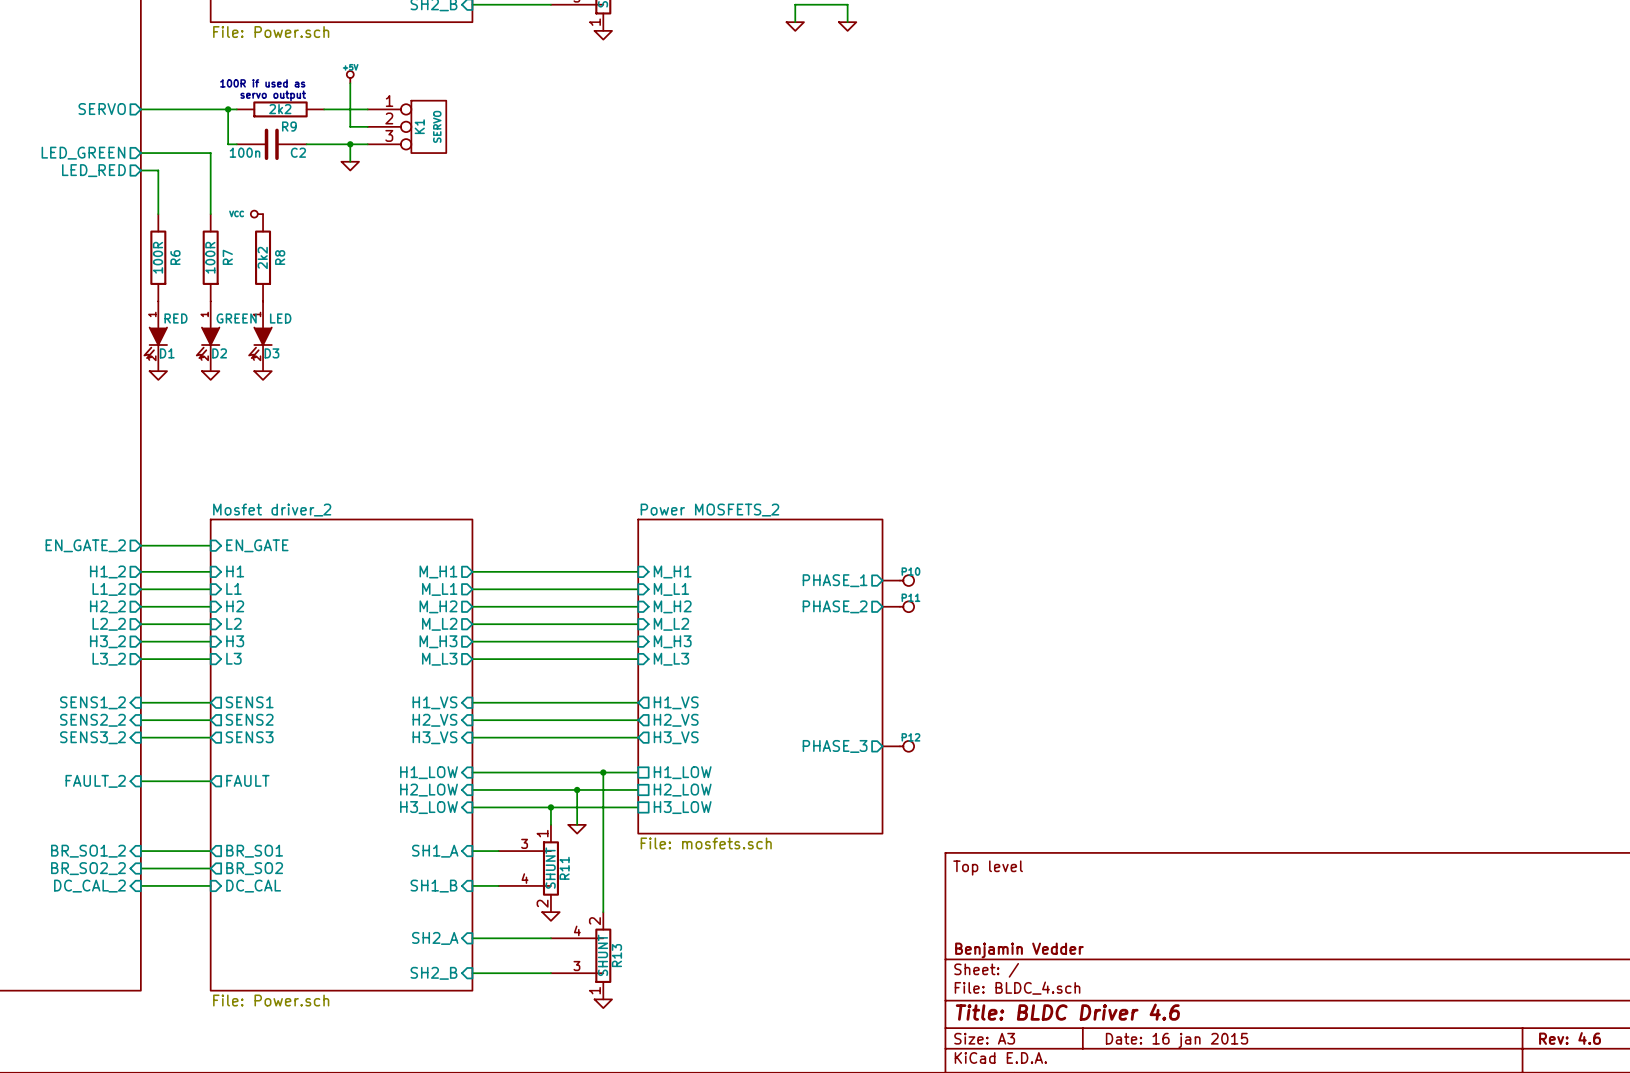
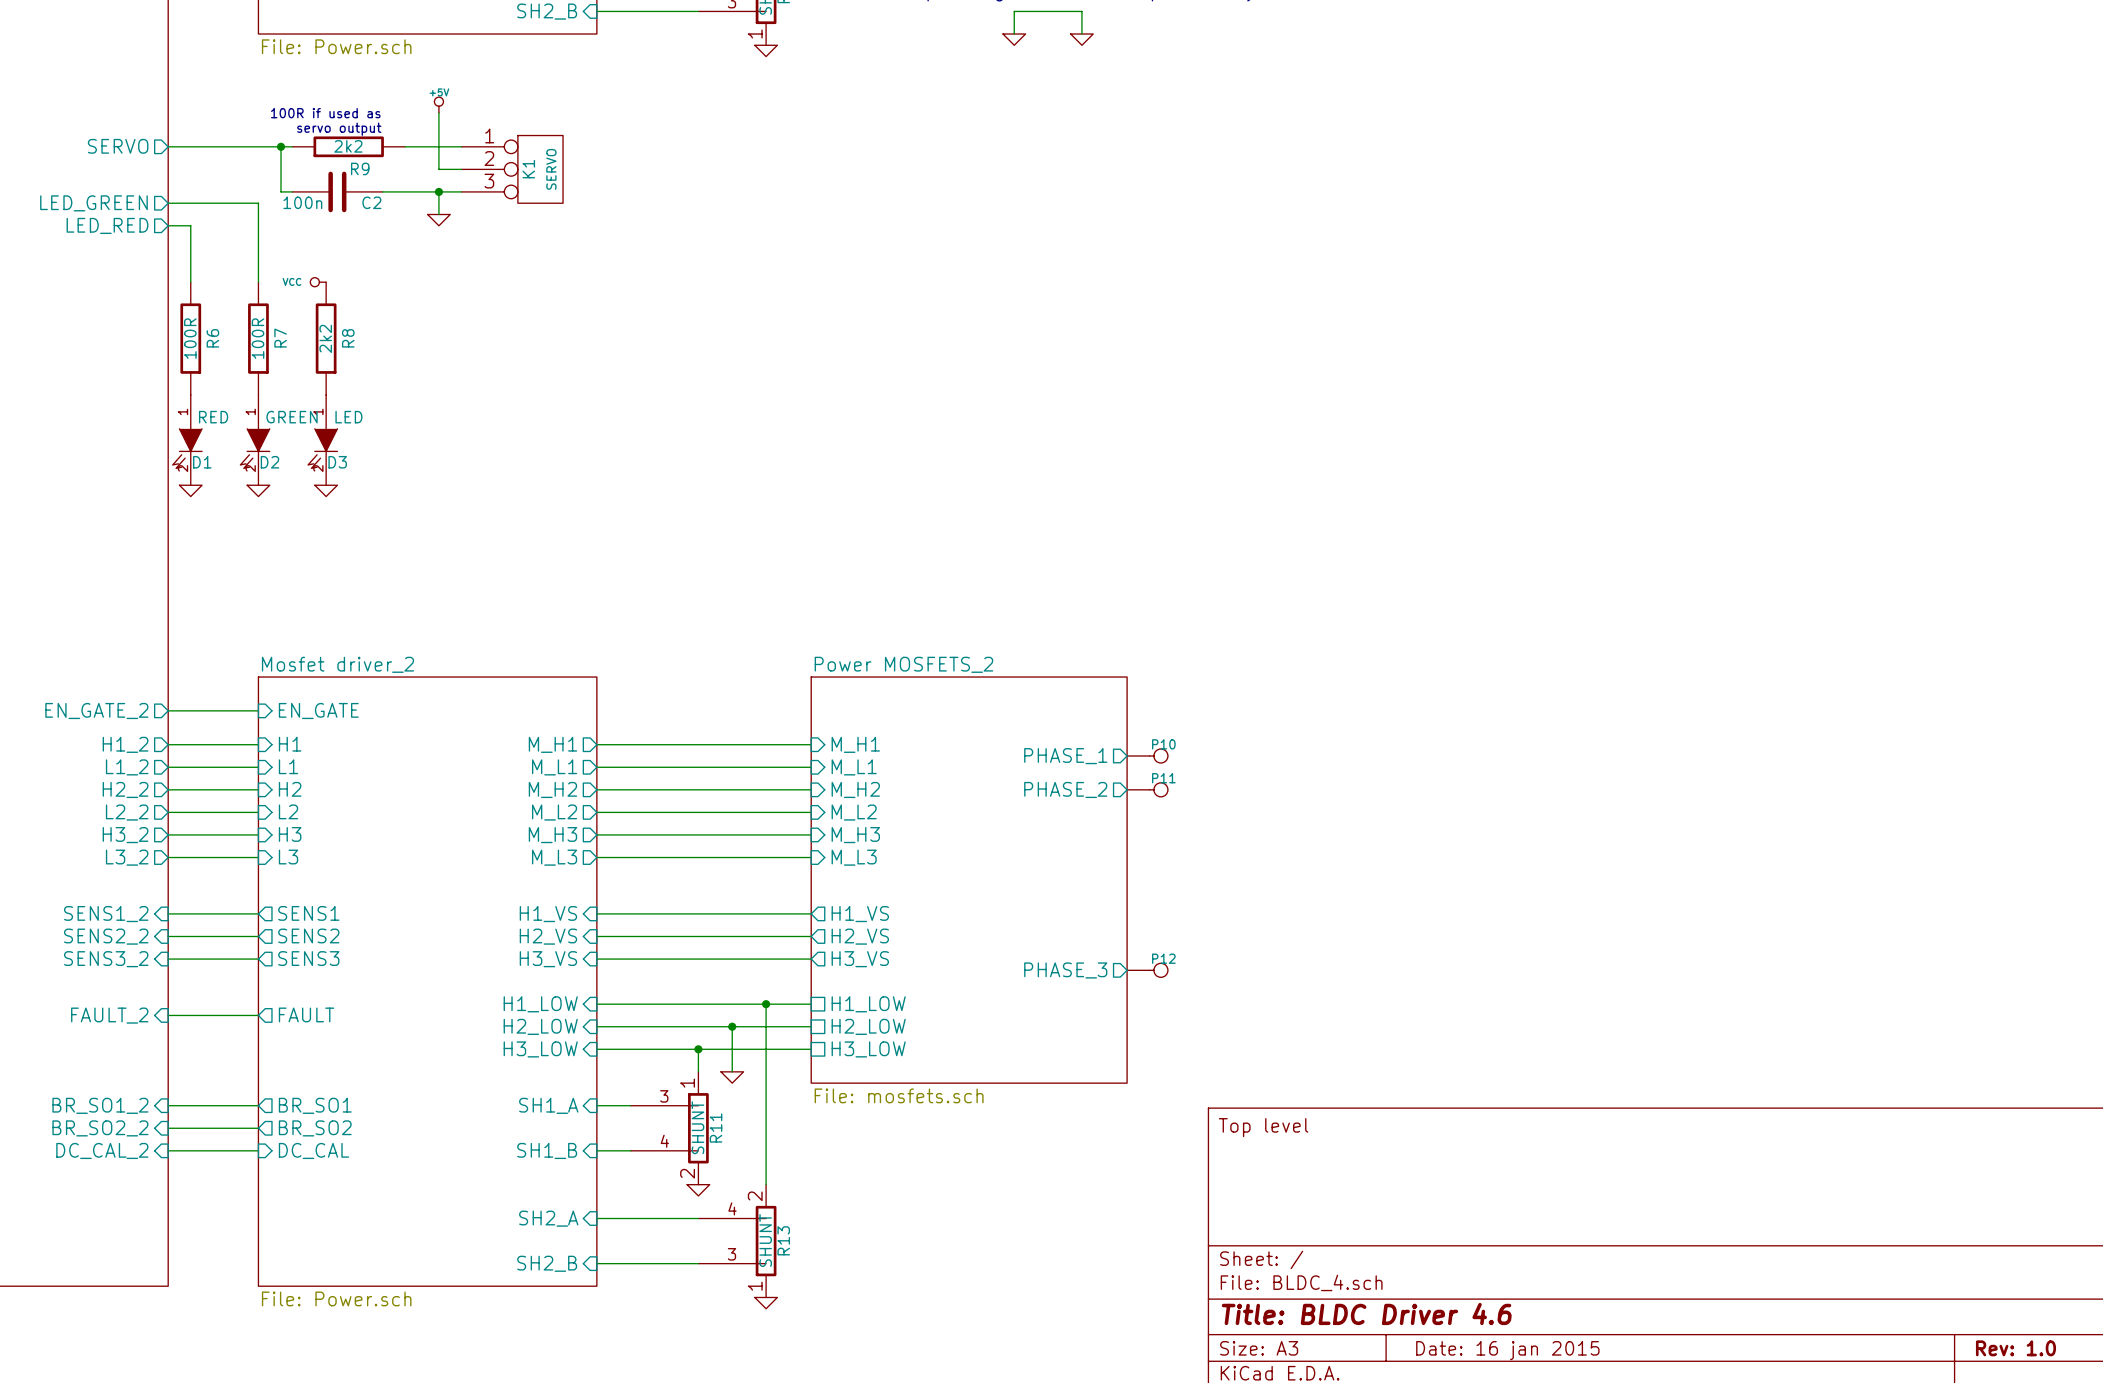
title block: Benjamin Vedder (1019, 950) -> none
title block: Rev: 4.6 (1570, 1038) -> Rev: 1.0 (2015, 1348)

